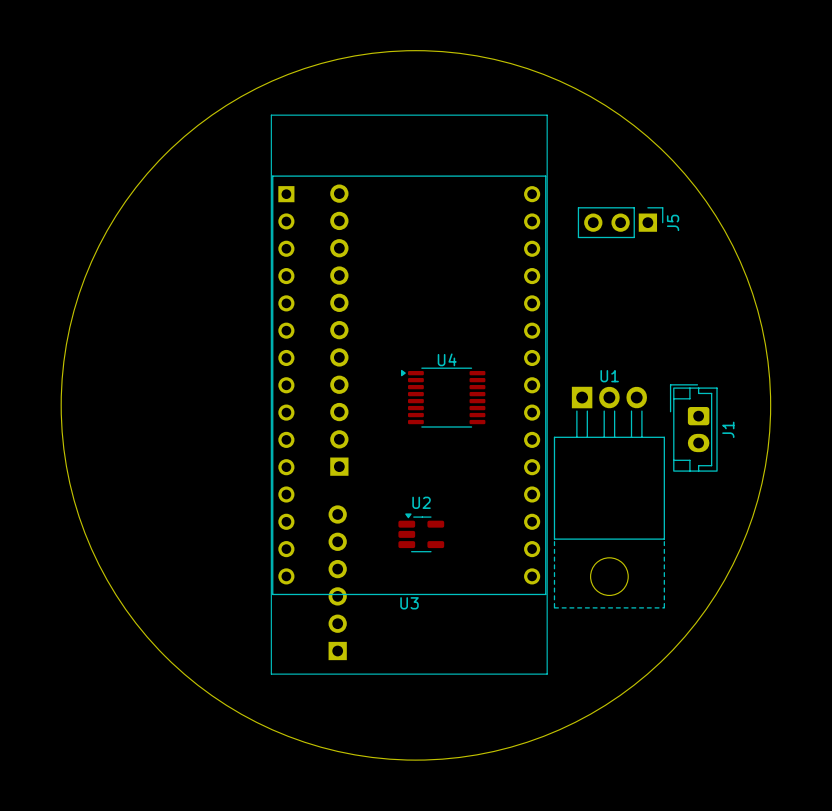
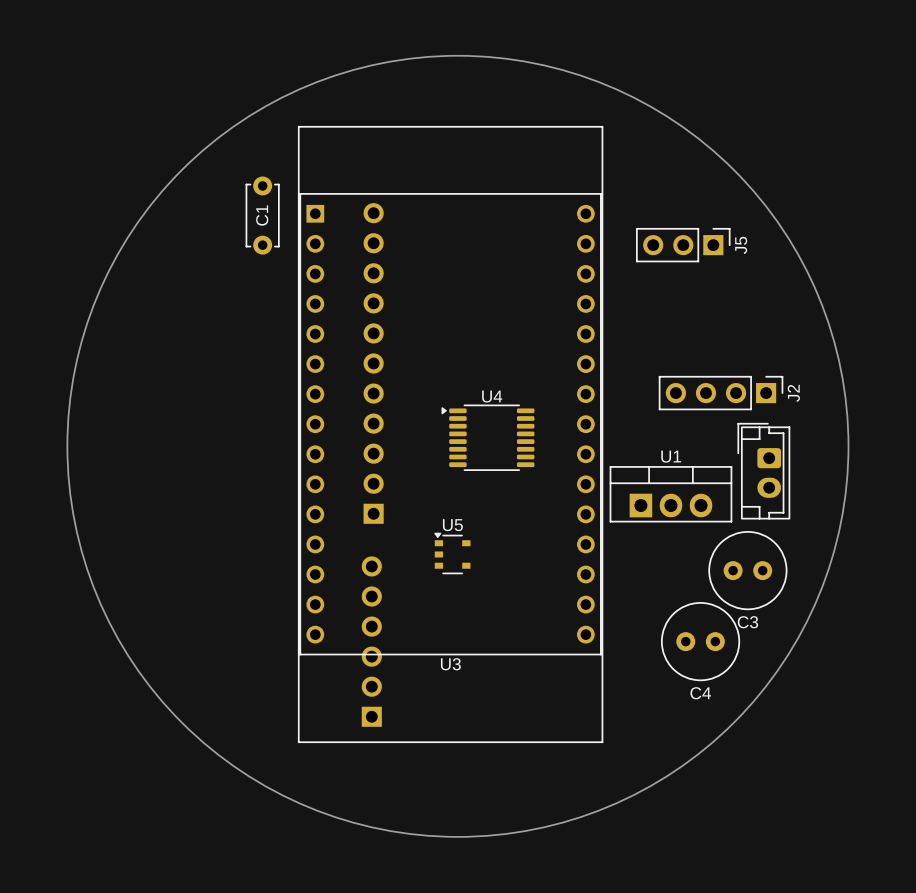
C1: none -> (262, 215)
J2: none -> (721, 393)
U1 name position: U1 (609, 376) -> U1 (671, 456)
U1 footprint: [553, 386, 665, 609] -> [609, 466, 733, 523]
J1 name: J1 (728, 429) -> none
U5: none -> (452, 553)
C3: none -> (747, 570)
U2: (421, 532) -> none
C4: none -> (700, 641)

